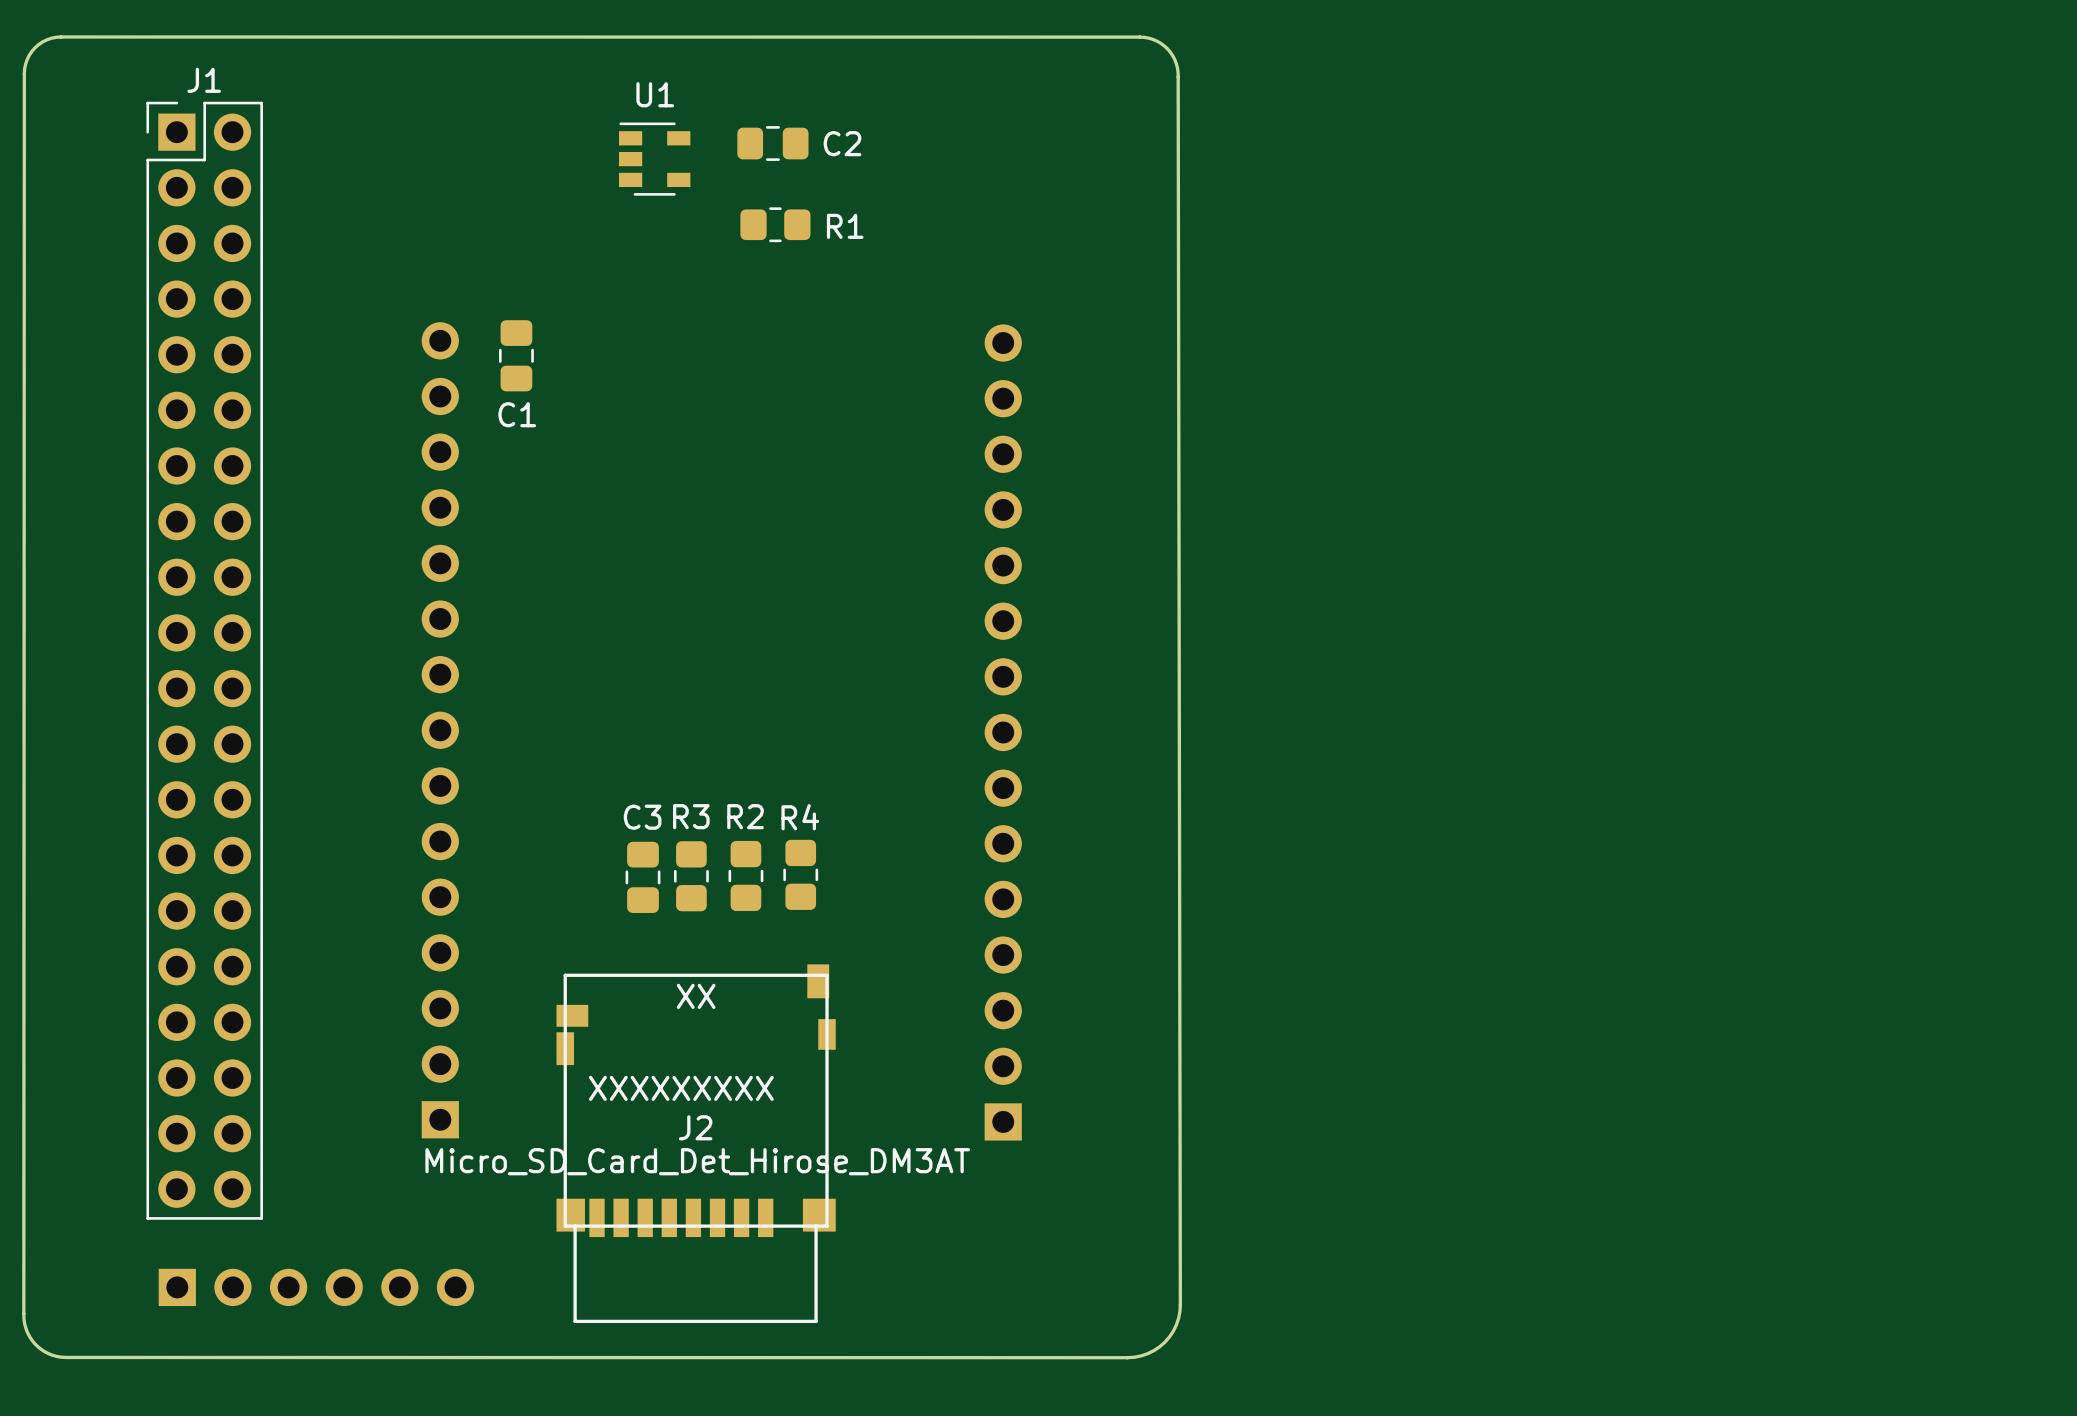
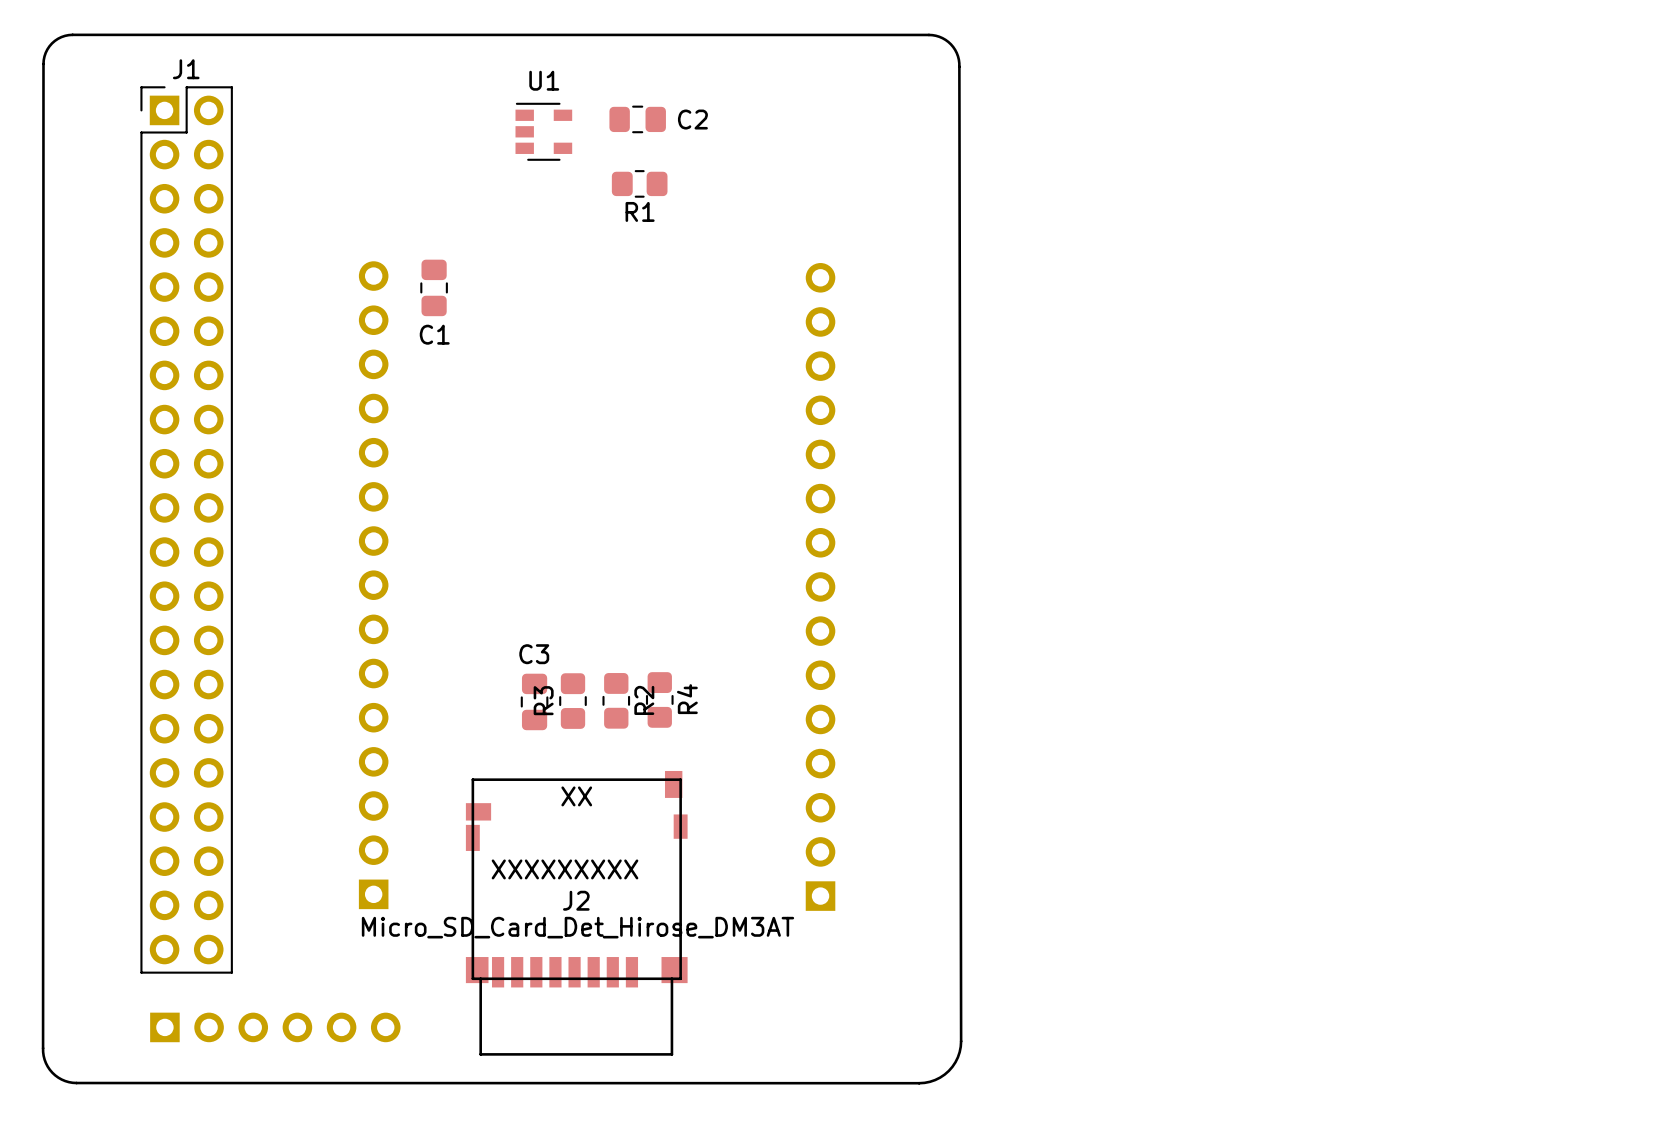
R1 name position: R1 (845, 226) -> R1 (640, 211)
R3 name rotation: 0° (691, 816) -> 90° counterclockwise (543, 700)
R3 name position: R3 (691, 816) -> R3 (543, 700)
R2 name rotation: 0° (745, 816) -> 90° counterclockwise (644, 700)
R2 name position: R2 (745, 816) -> R2 (644, 700)
R4 name rotation: 0° (800, 817) -> 90° counterclockwise (687, 699)
R4 name position: R4 (800, 817) -> R4 (687, 699)

